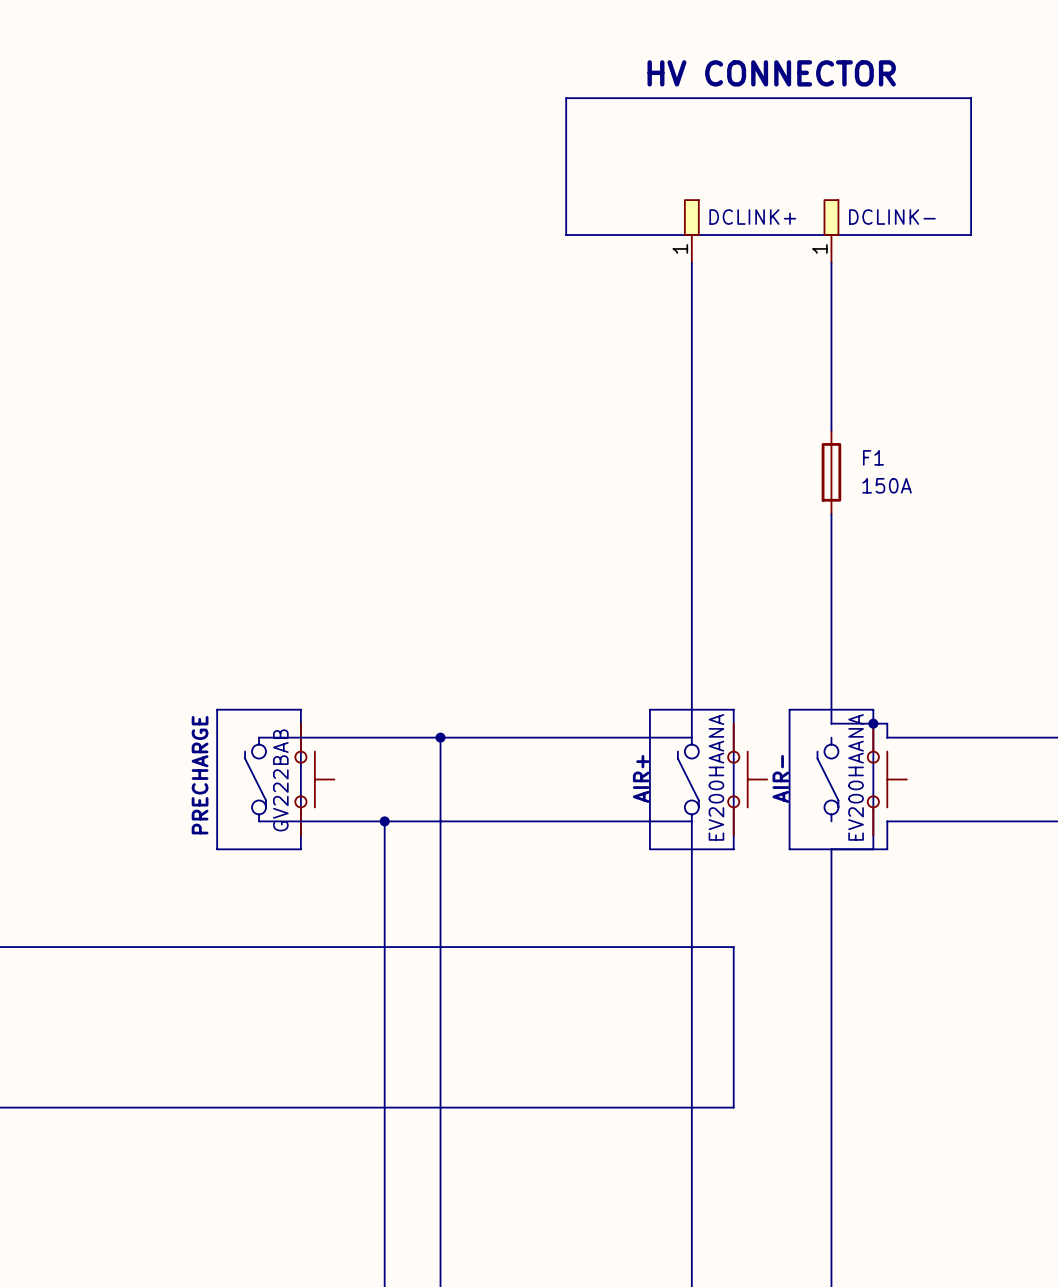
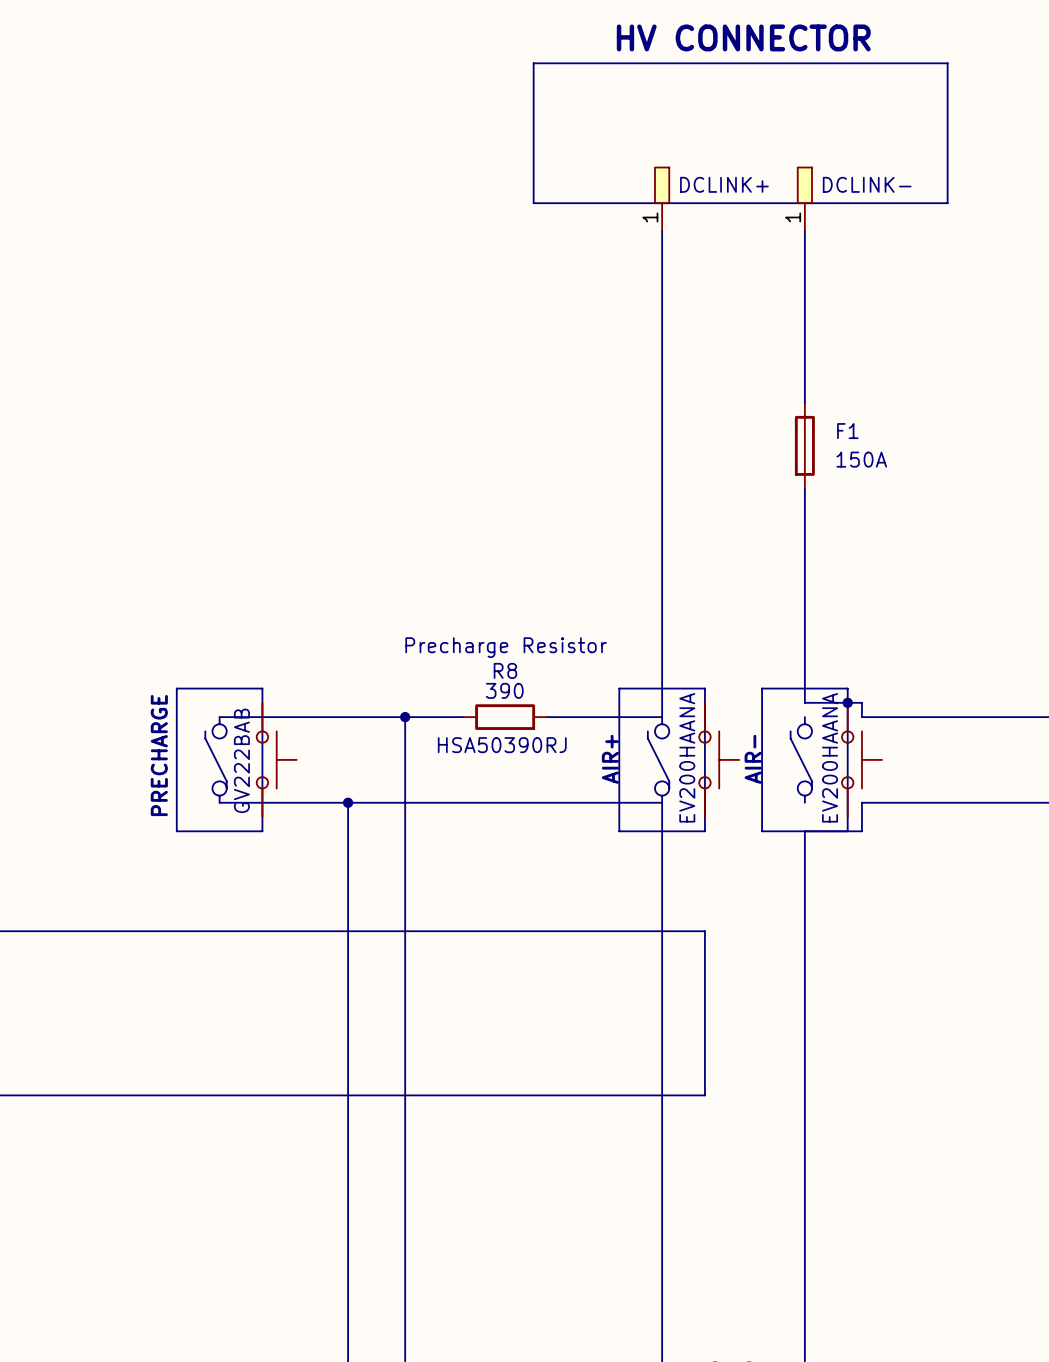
text: none -> Precharge Resistor (506, 647)
wire: (496, 737) (580, 737) -> none
R8: none -> 390 (505, 717)

